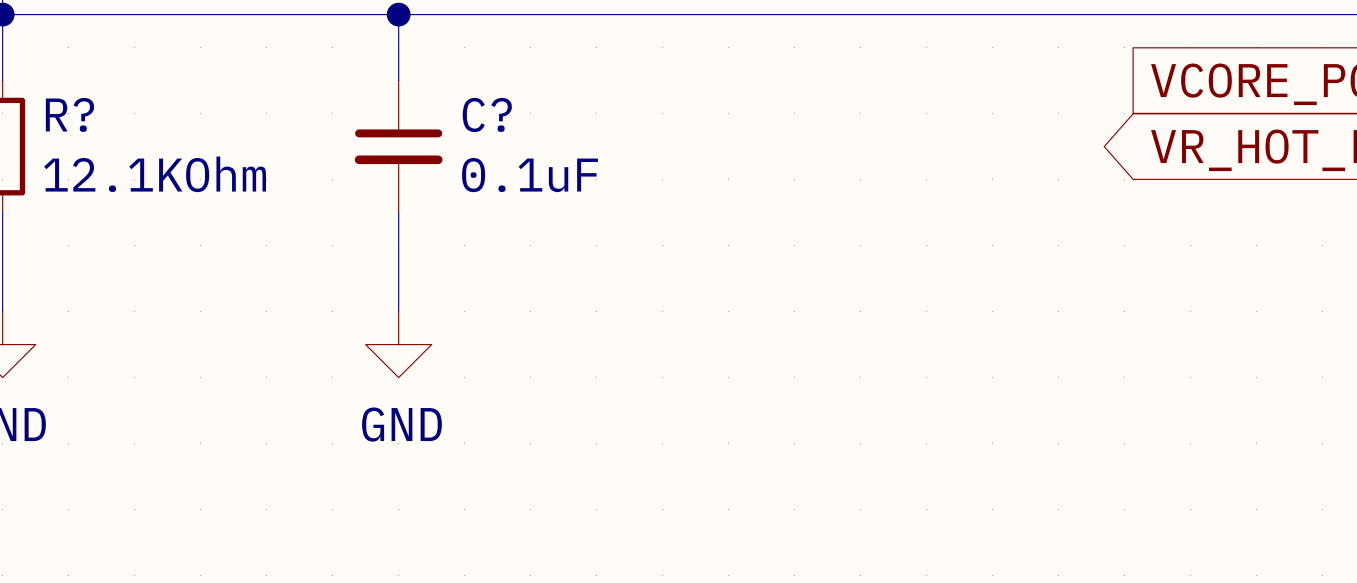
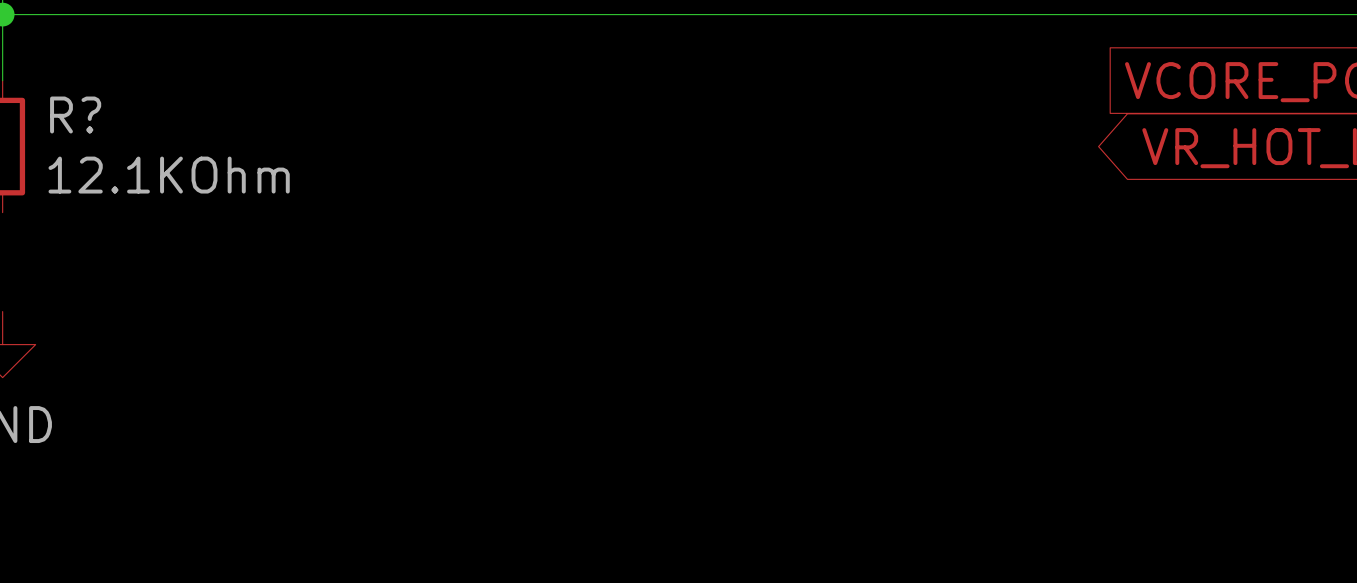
wire: (398, 14) (398, 80) -> none
junction: (398, 14) -> none
C?: 0.1uF (398, 146) -> none
wire: (2, 212) (2, 311) -> none
wire: (398, 212) (398, 311) -> none
power symbol: GND (398, 344) -> none

